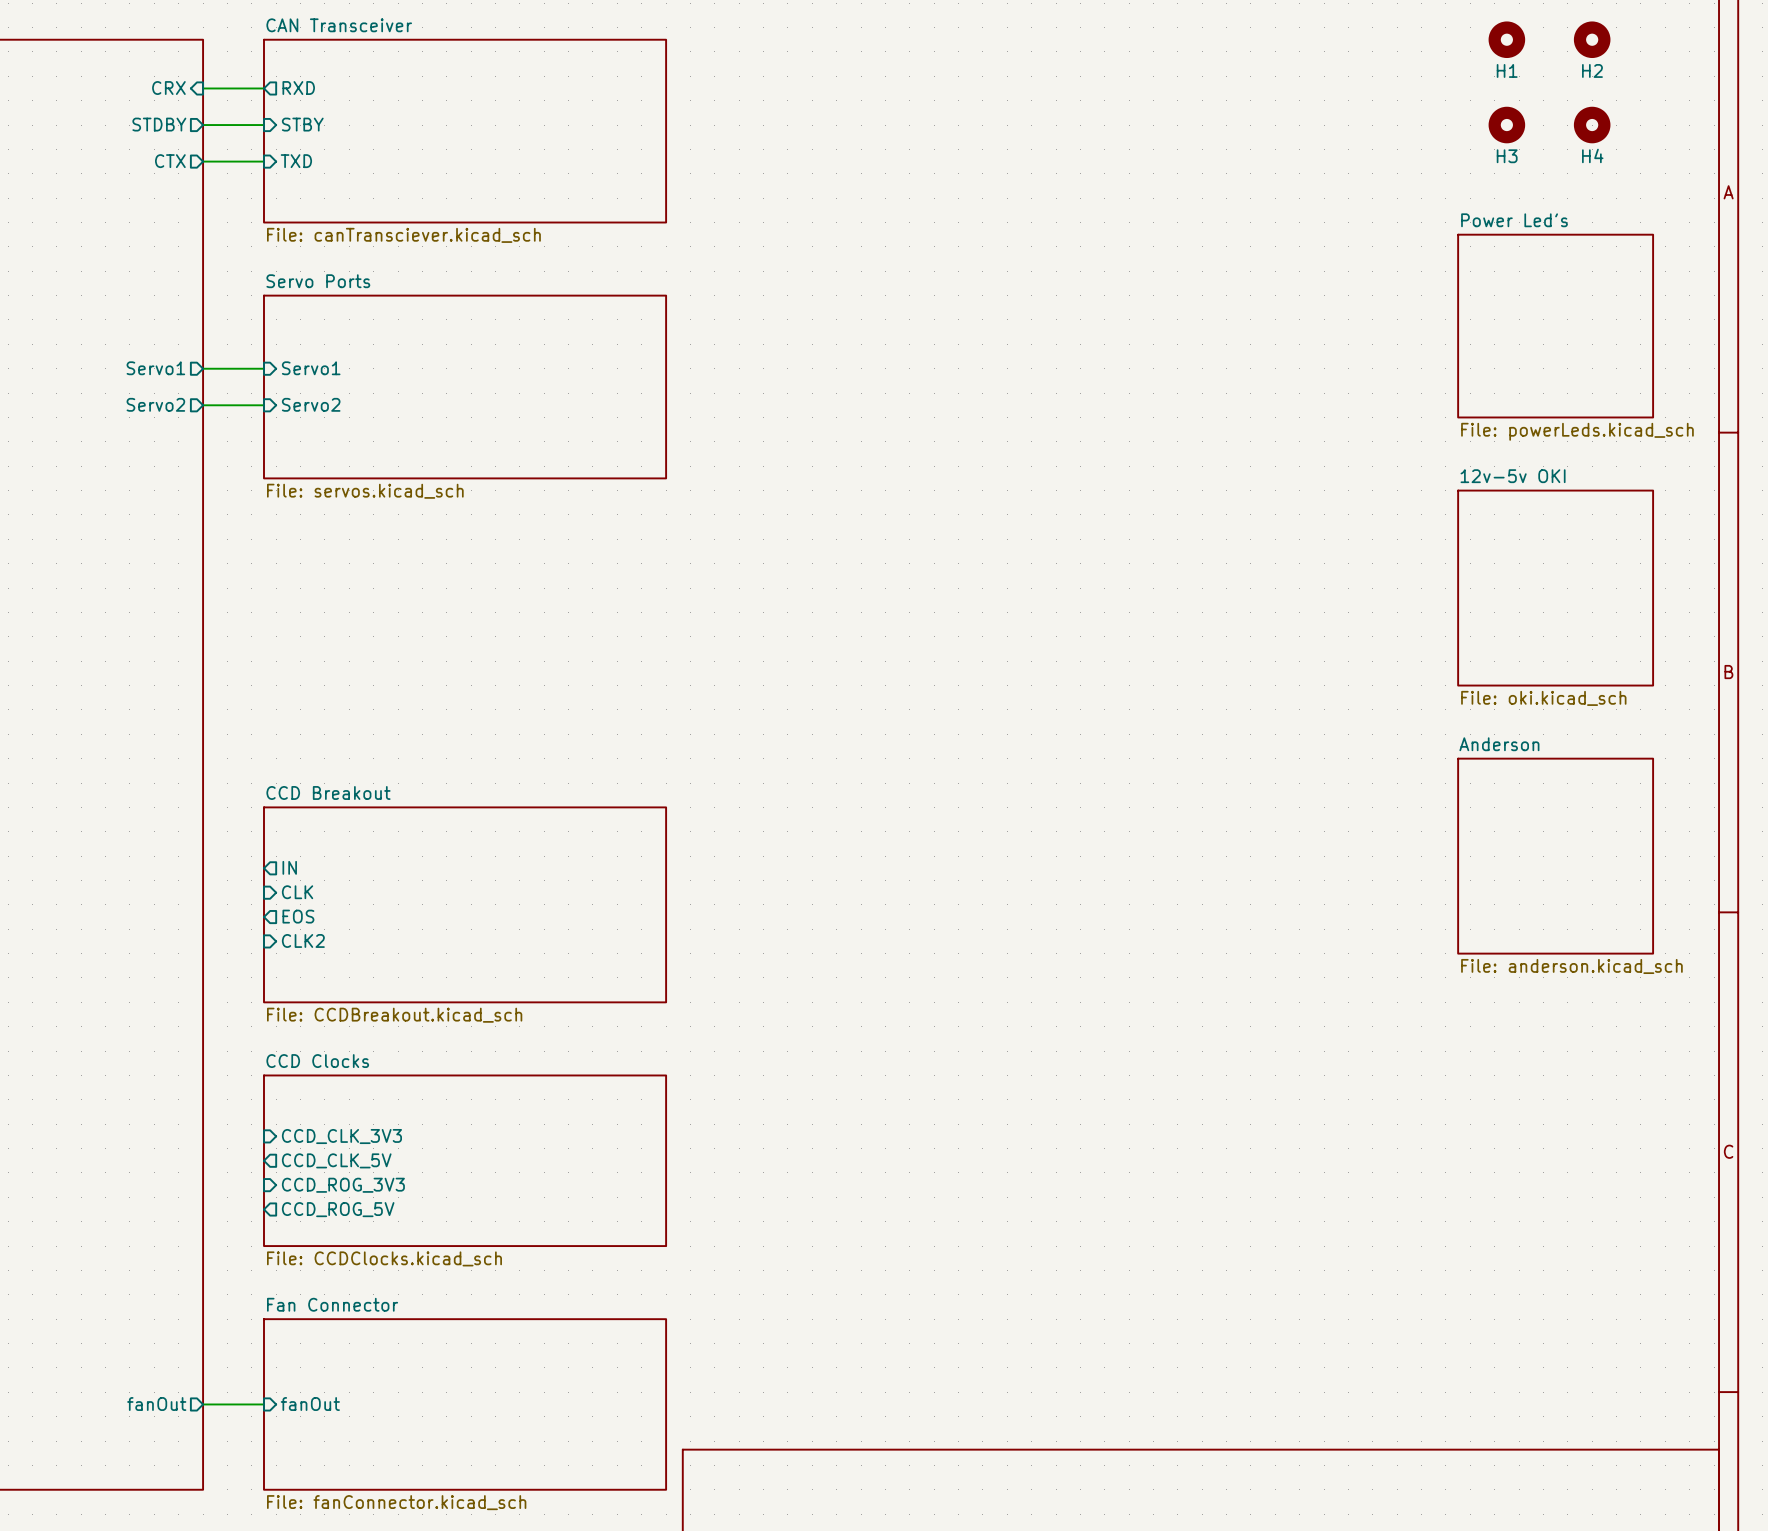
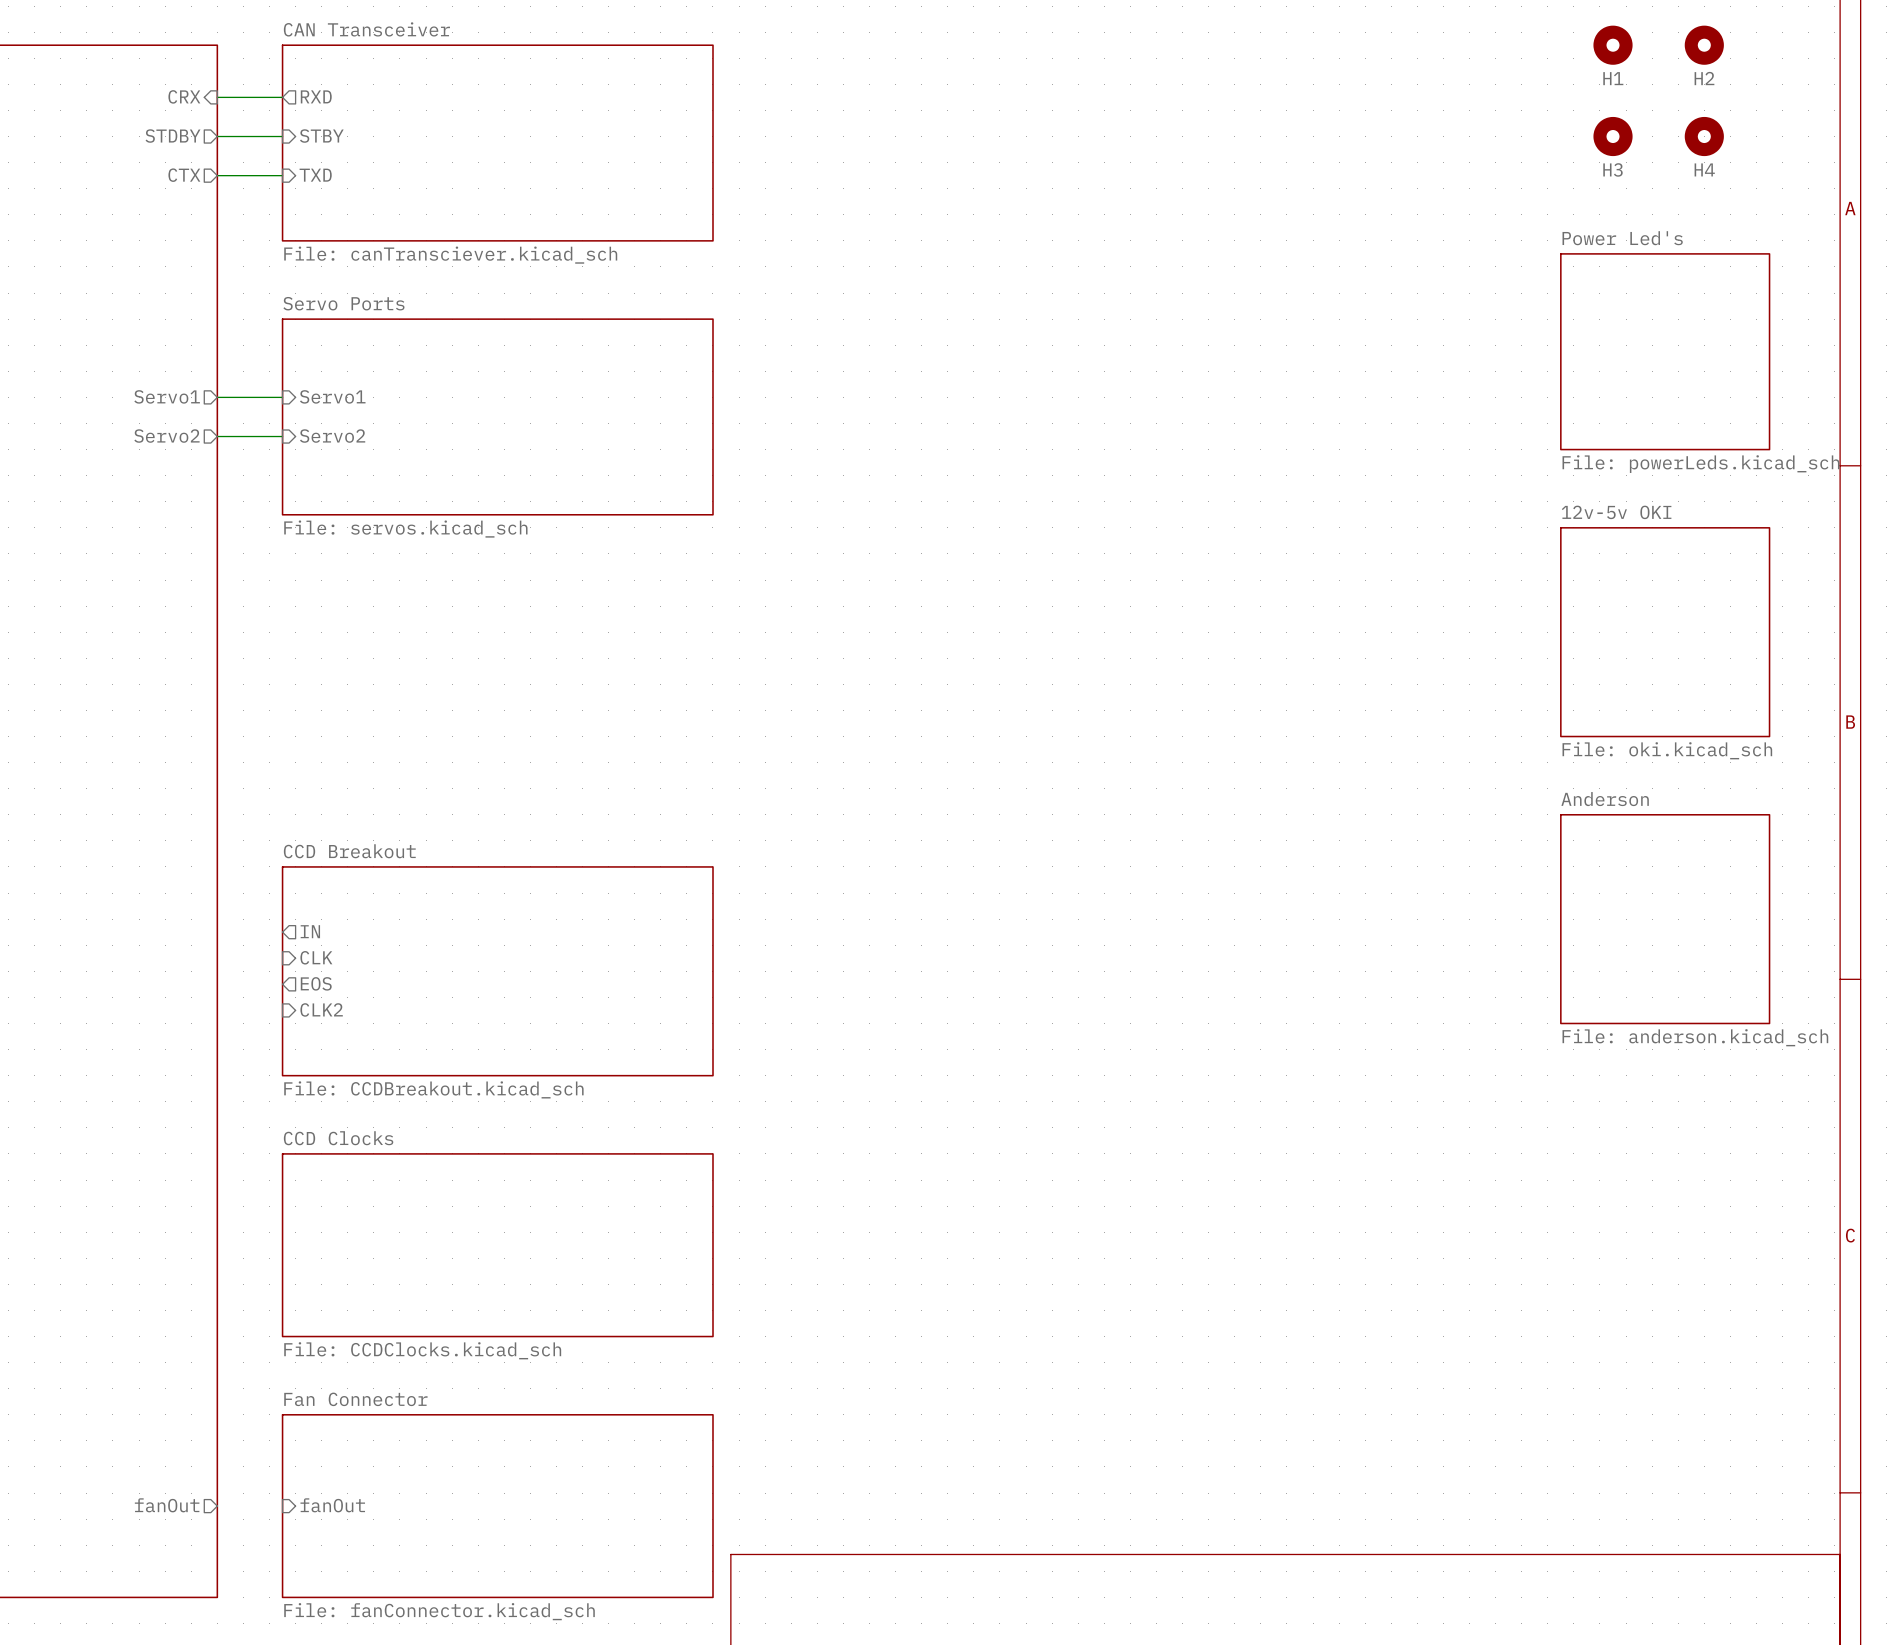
sheet pin: CCD_CLK_3V3 (341, 1136) -> none
sheet pin: CCD_CLK_5V (336, 1160) -> none
sheet pin: CCD_ROG_3V3 (343, 1185) -> none
sheet pin: CCD_ROG_5V (338, 1209) -> none
wire: (203, 1404) (263, 1404) -> none

